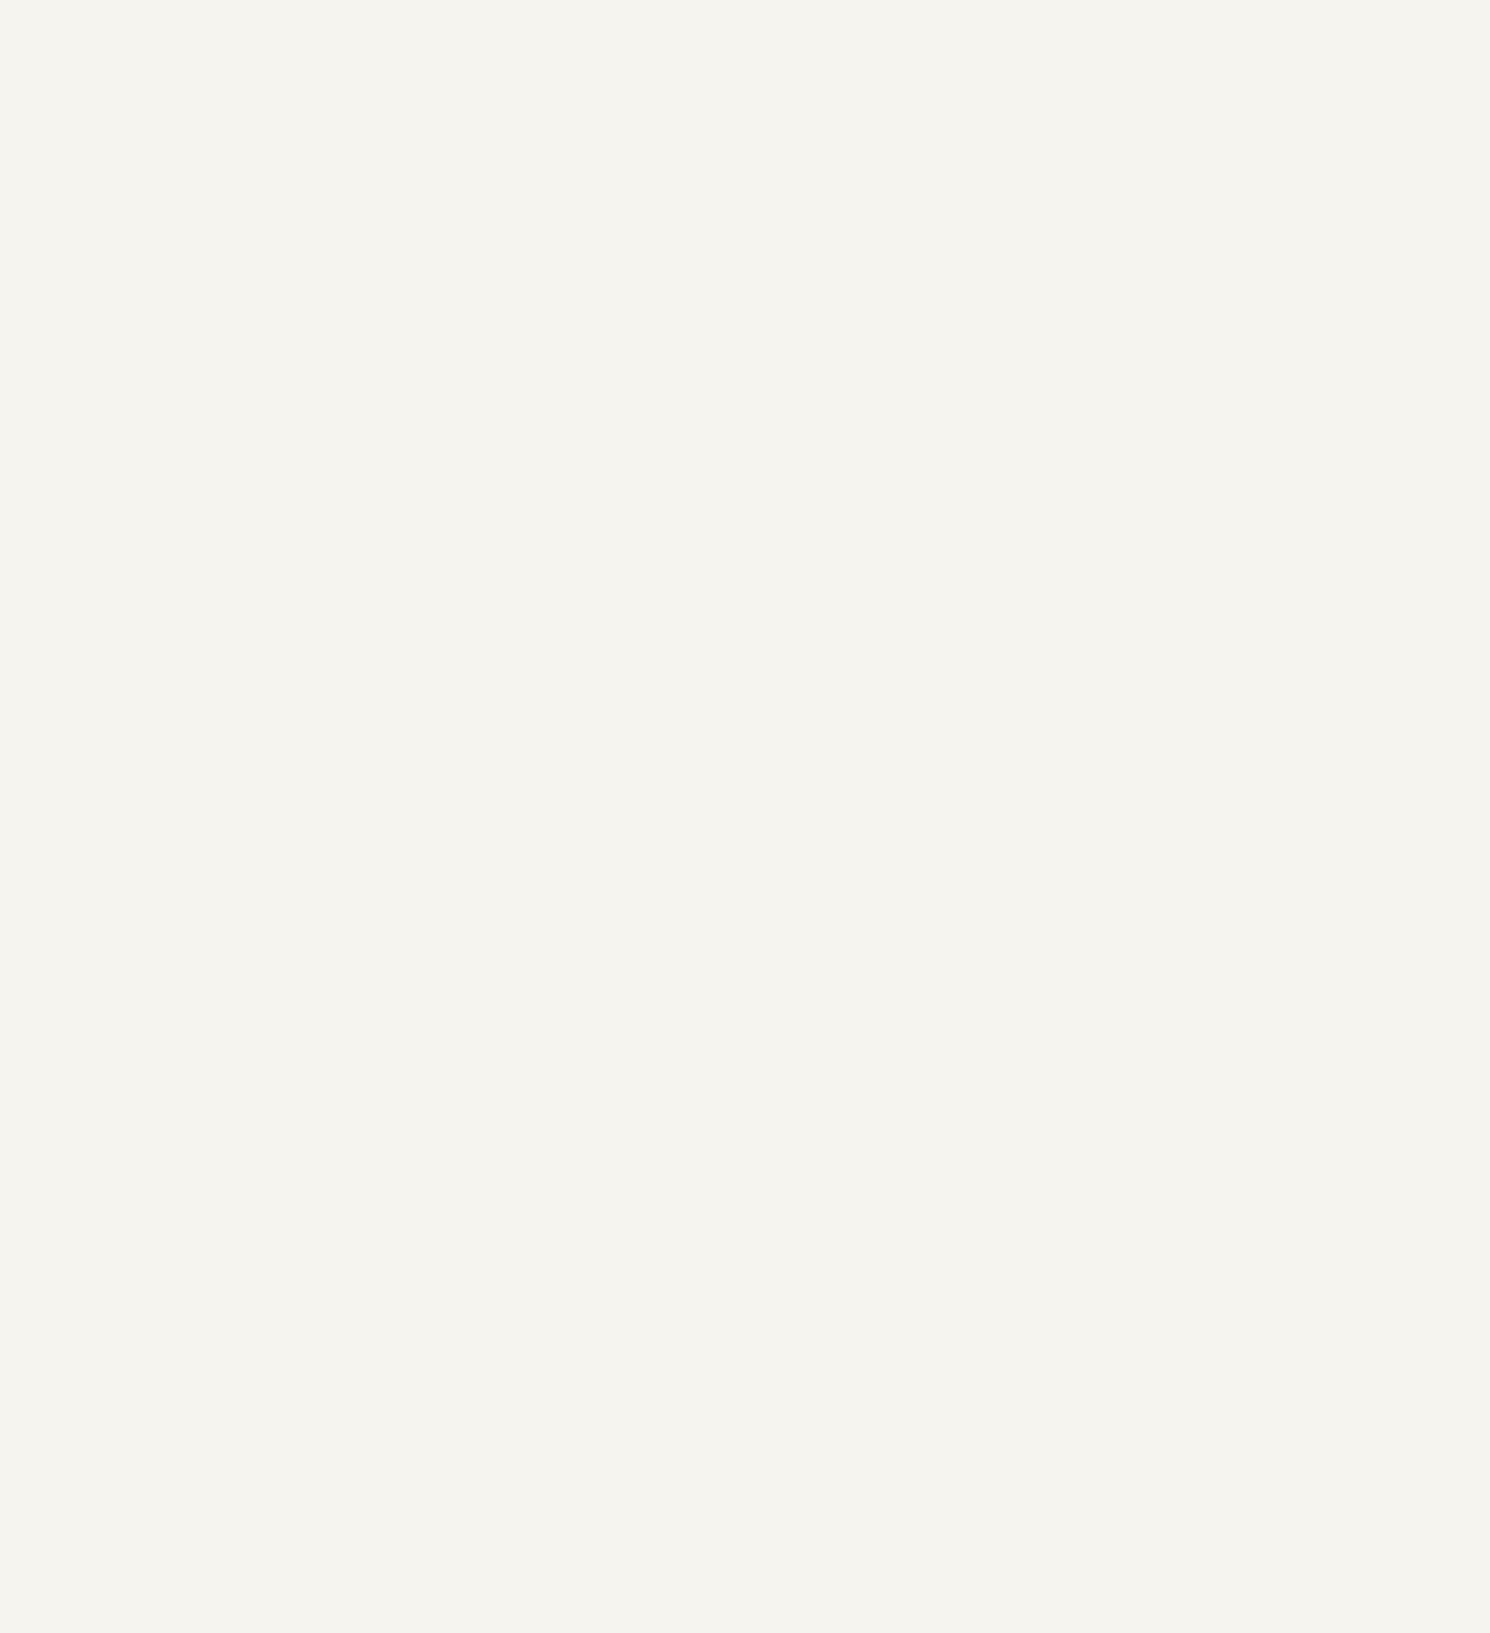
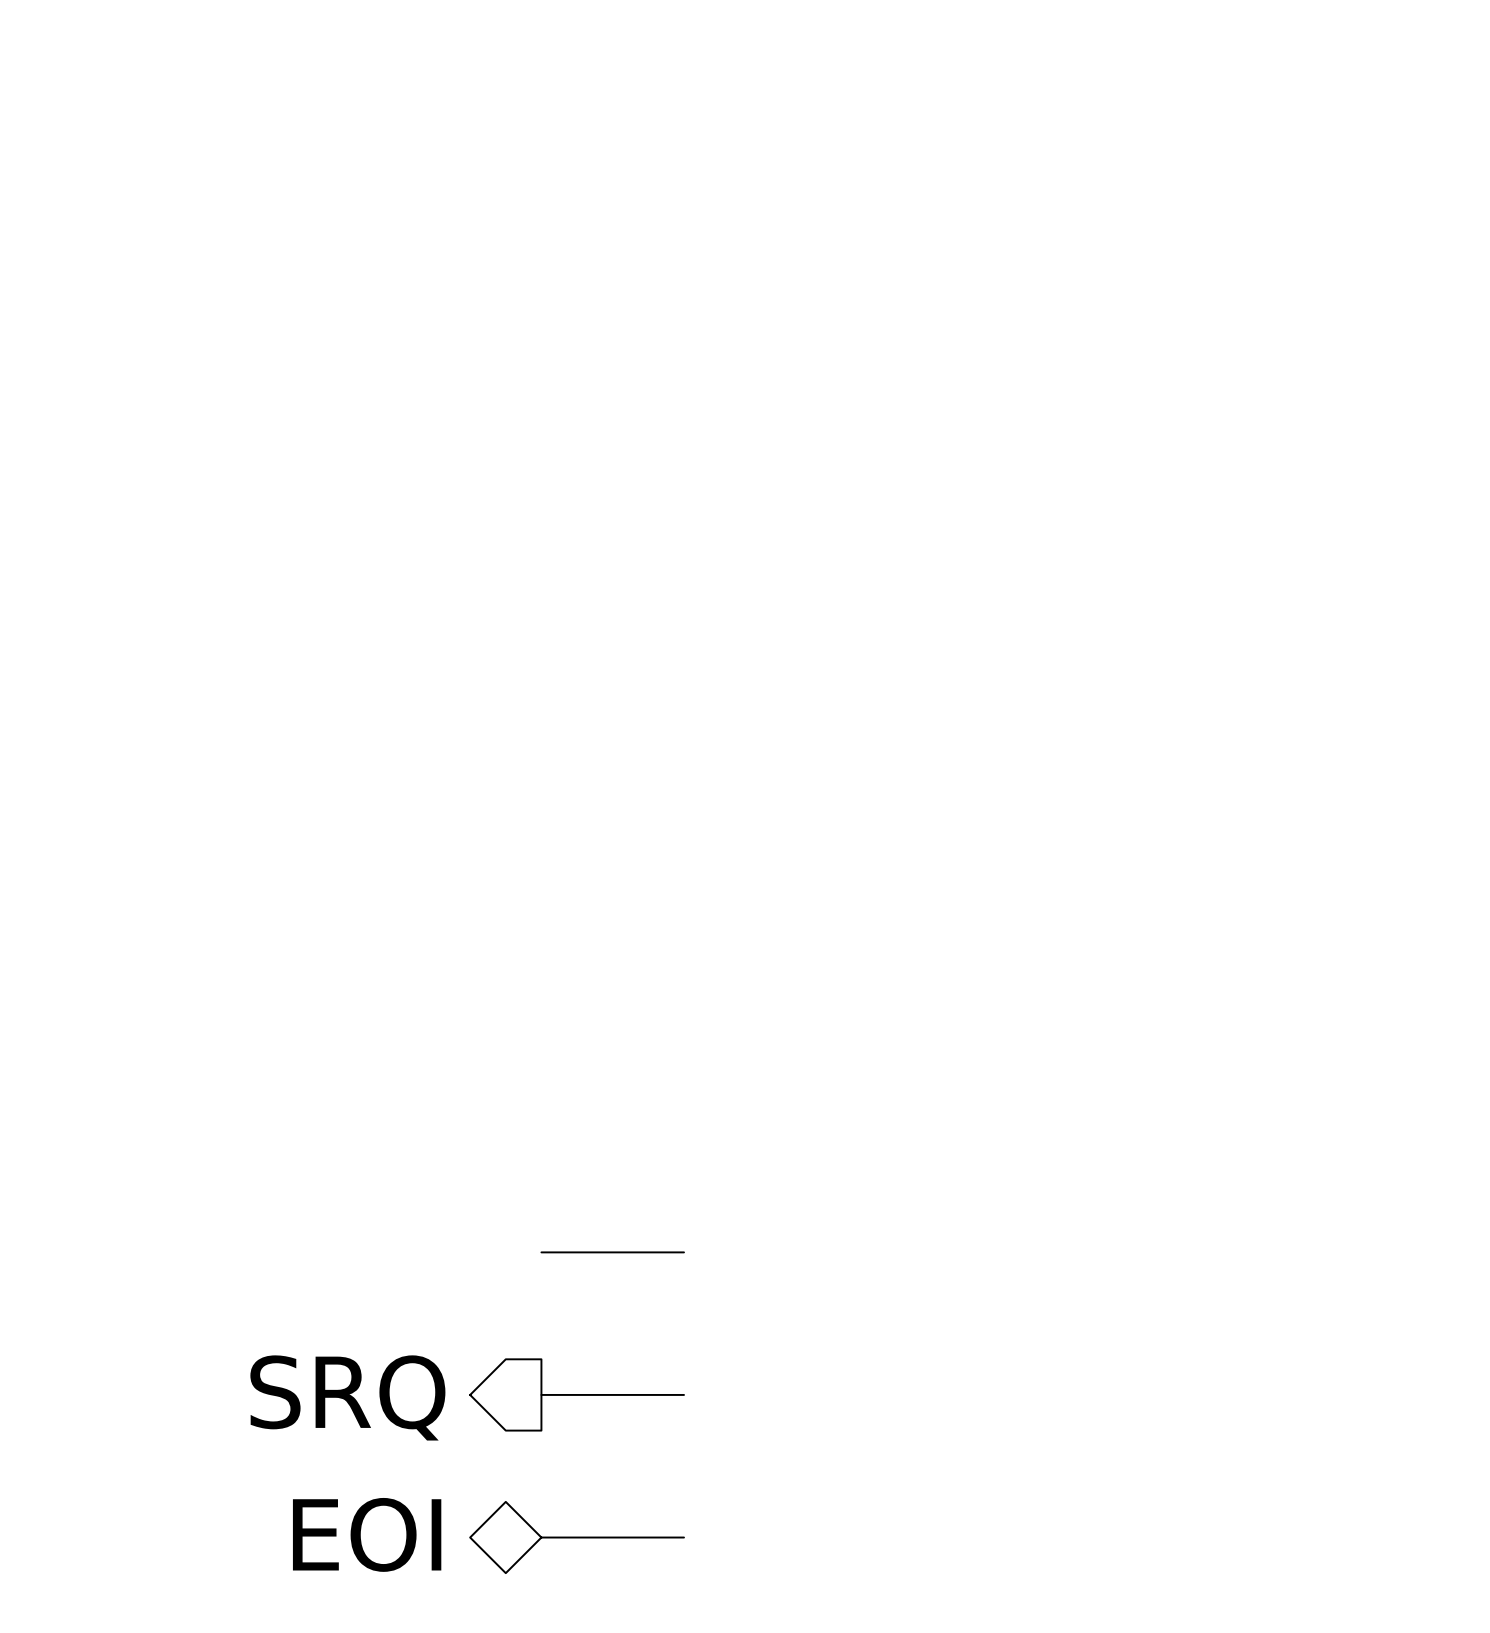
wire: none -> (541, 1252) (684, 1252)
wire: none -> (541, 1394) (684, 1394)
hierarchical label: none -> SRQ (347, 1397)
hierarchical label: none -> EOI (367, 1534)
wire: none -> (541, 1537) (684, 1537)

